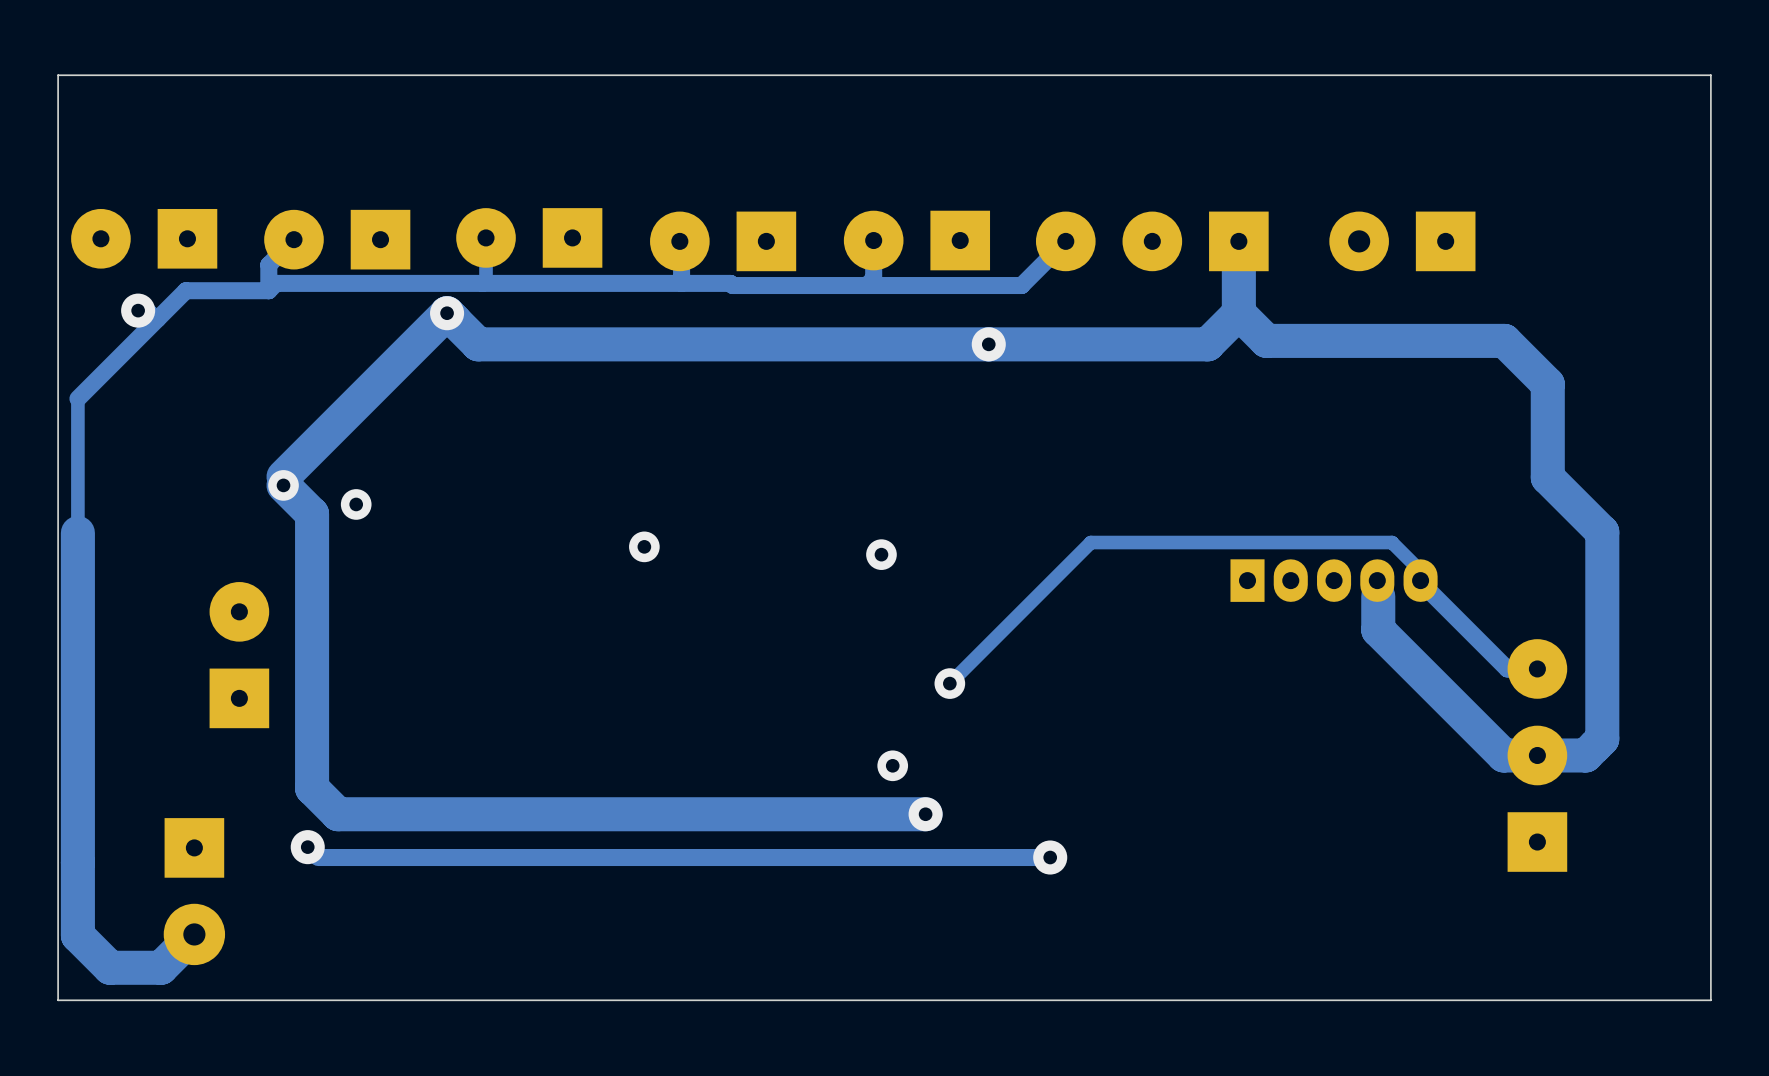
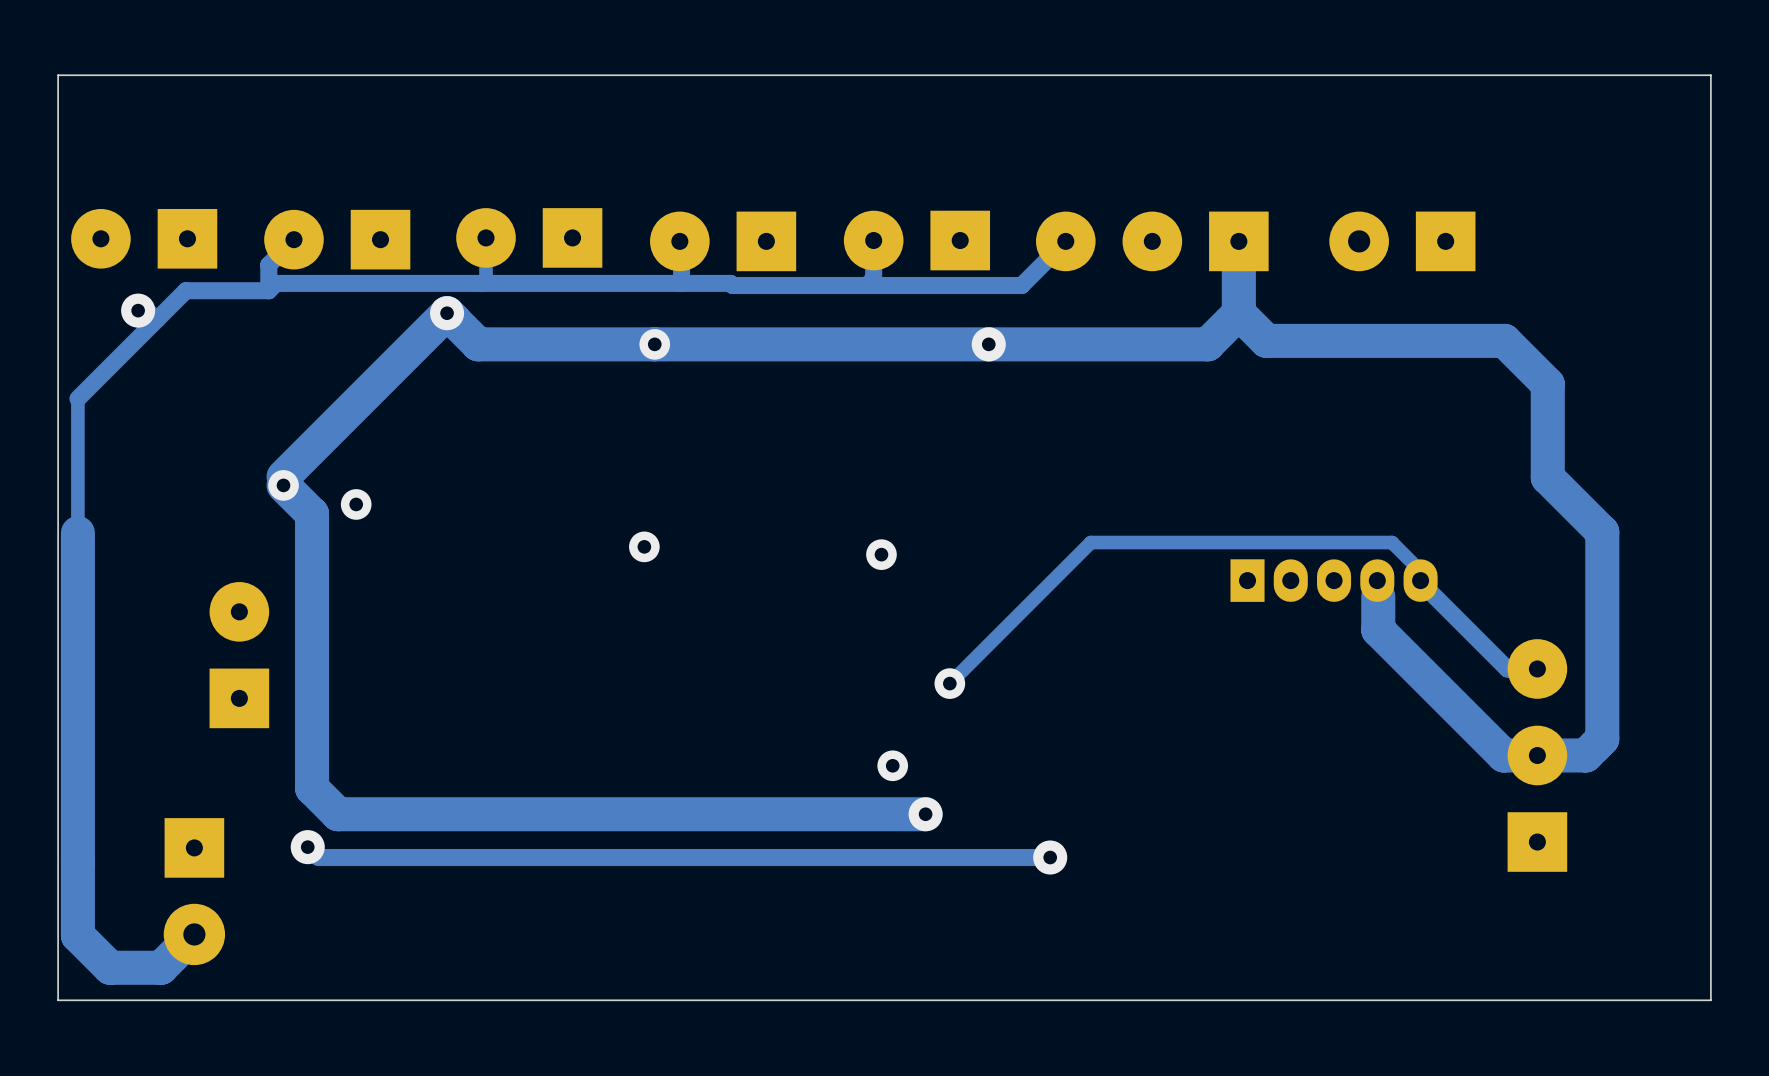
via: none -> (654, 344)

